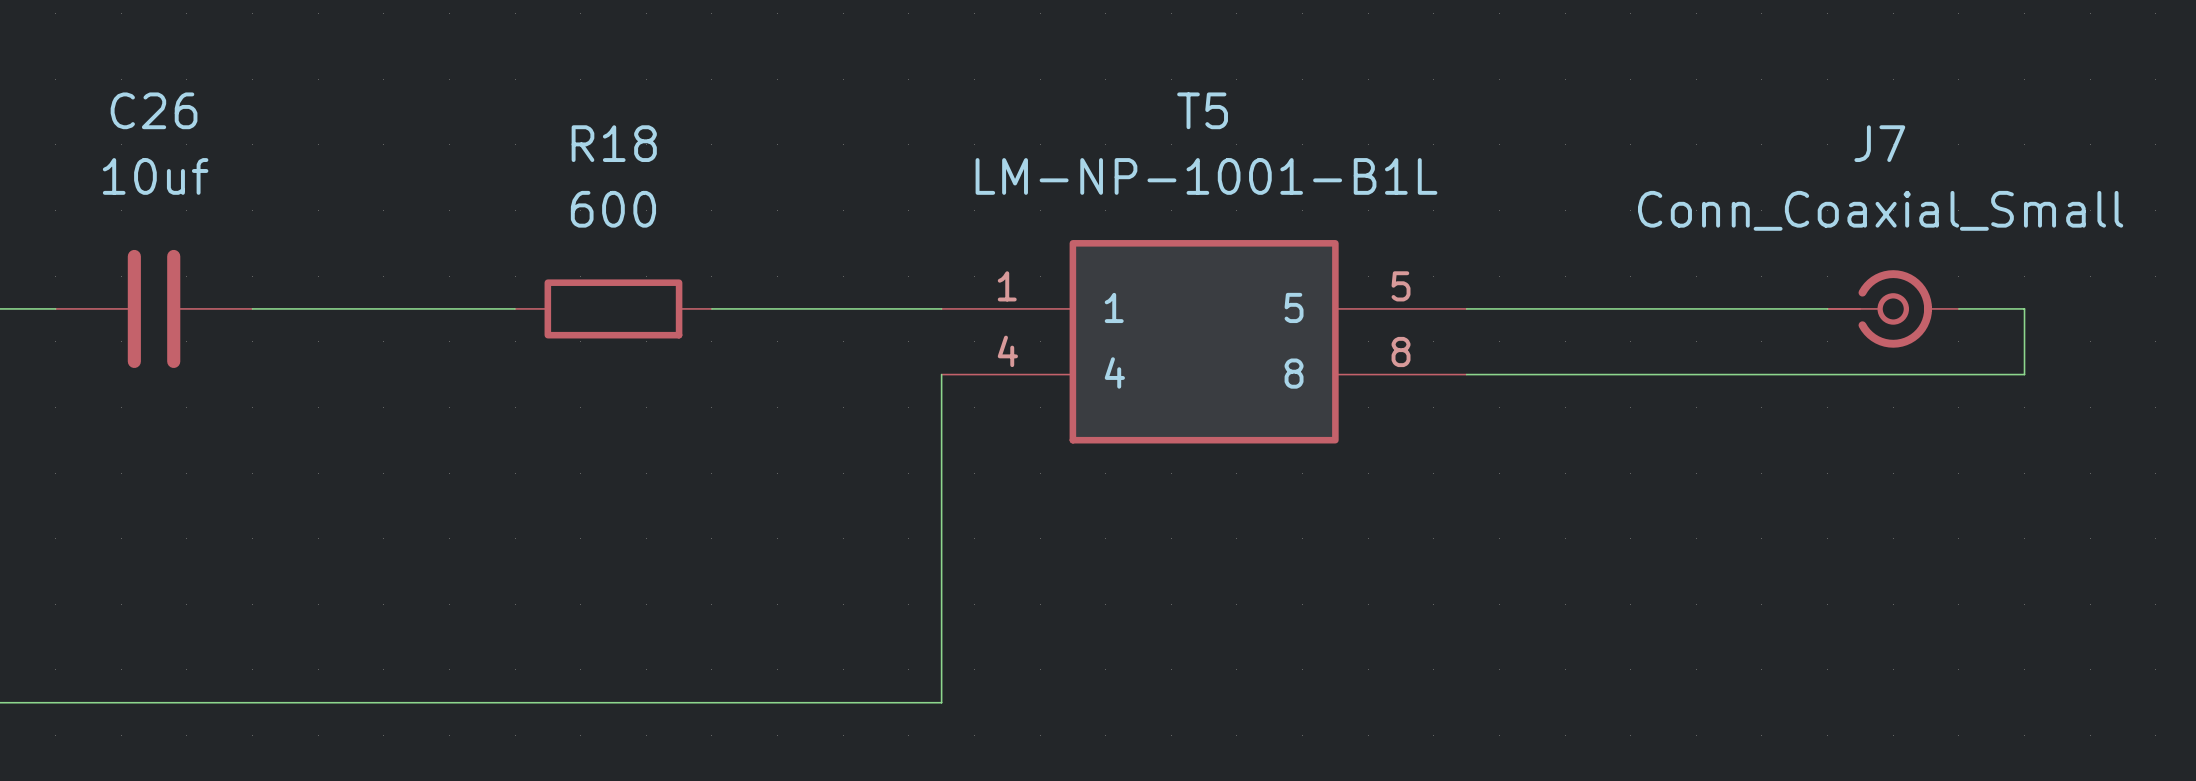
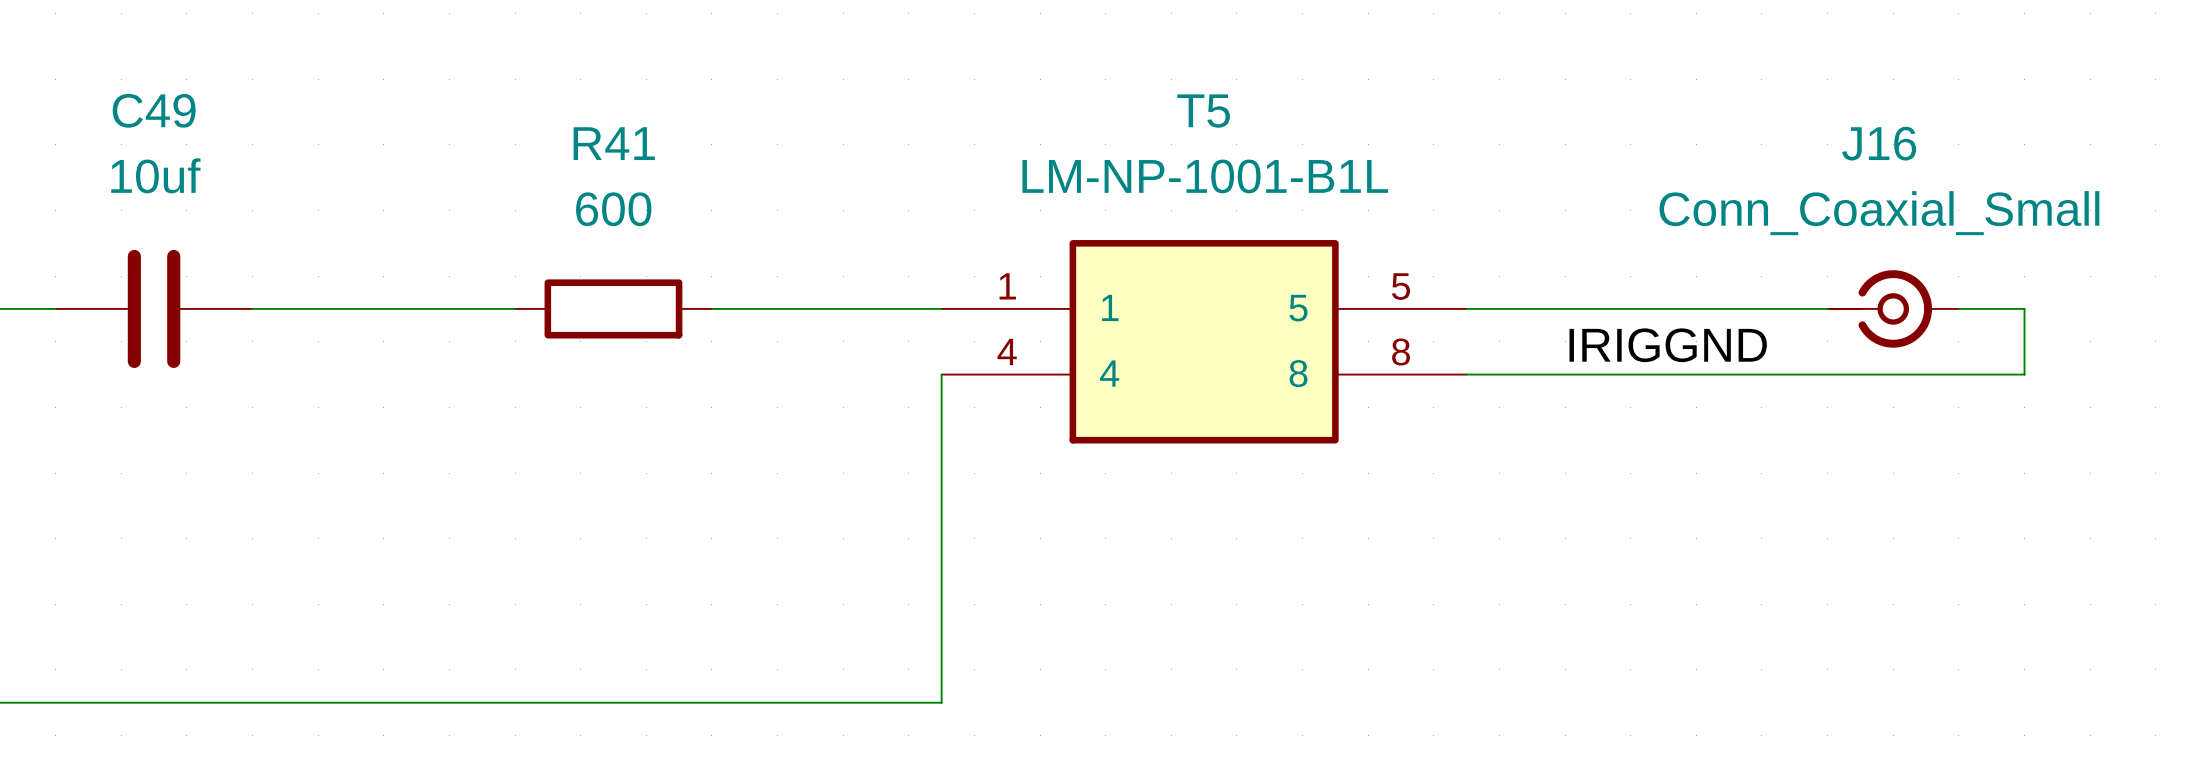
C26 name: C26 (154, 110) -> C49 (154, 110)
R18 name: R18 (614, 143) -> R41 (614, 143)
J7 name: J7 (1879, 143) -> J16 (1879, 143)
label: none -> IRIGGND (1668, 345)

